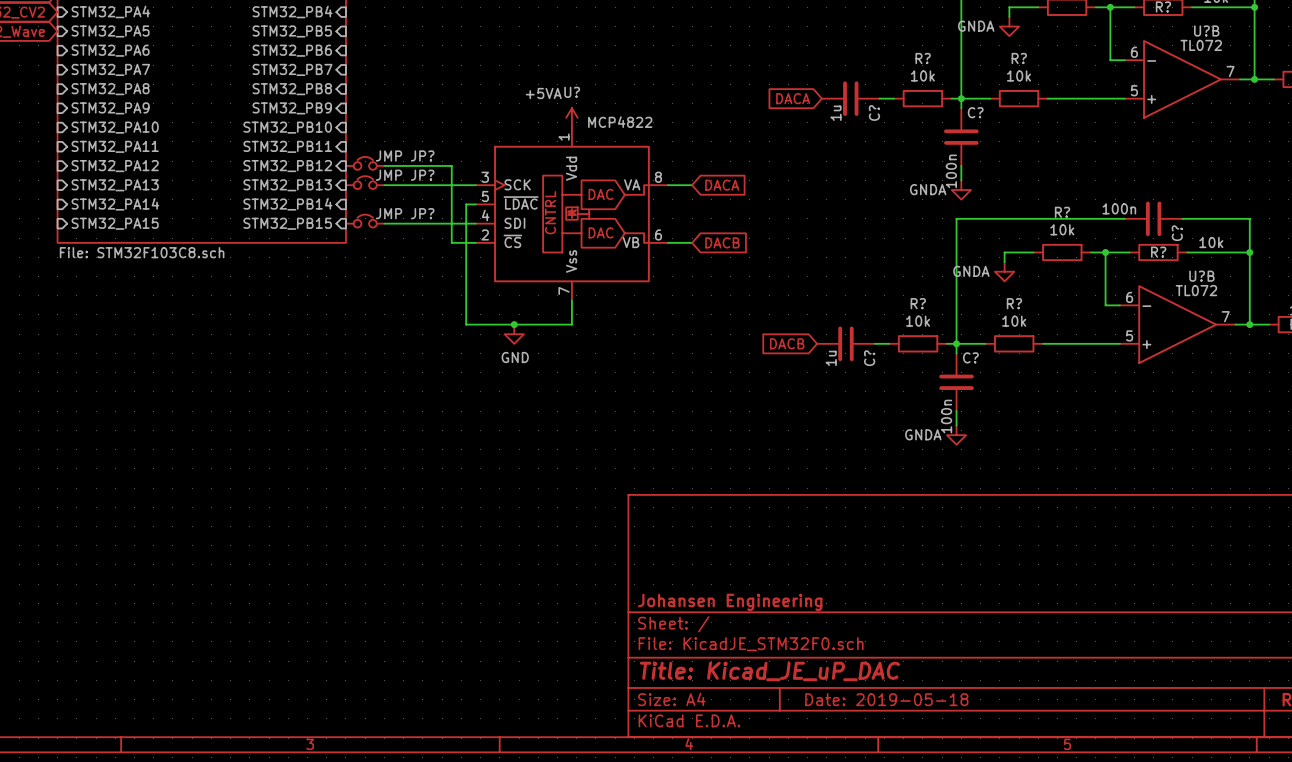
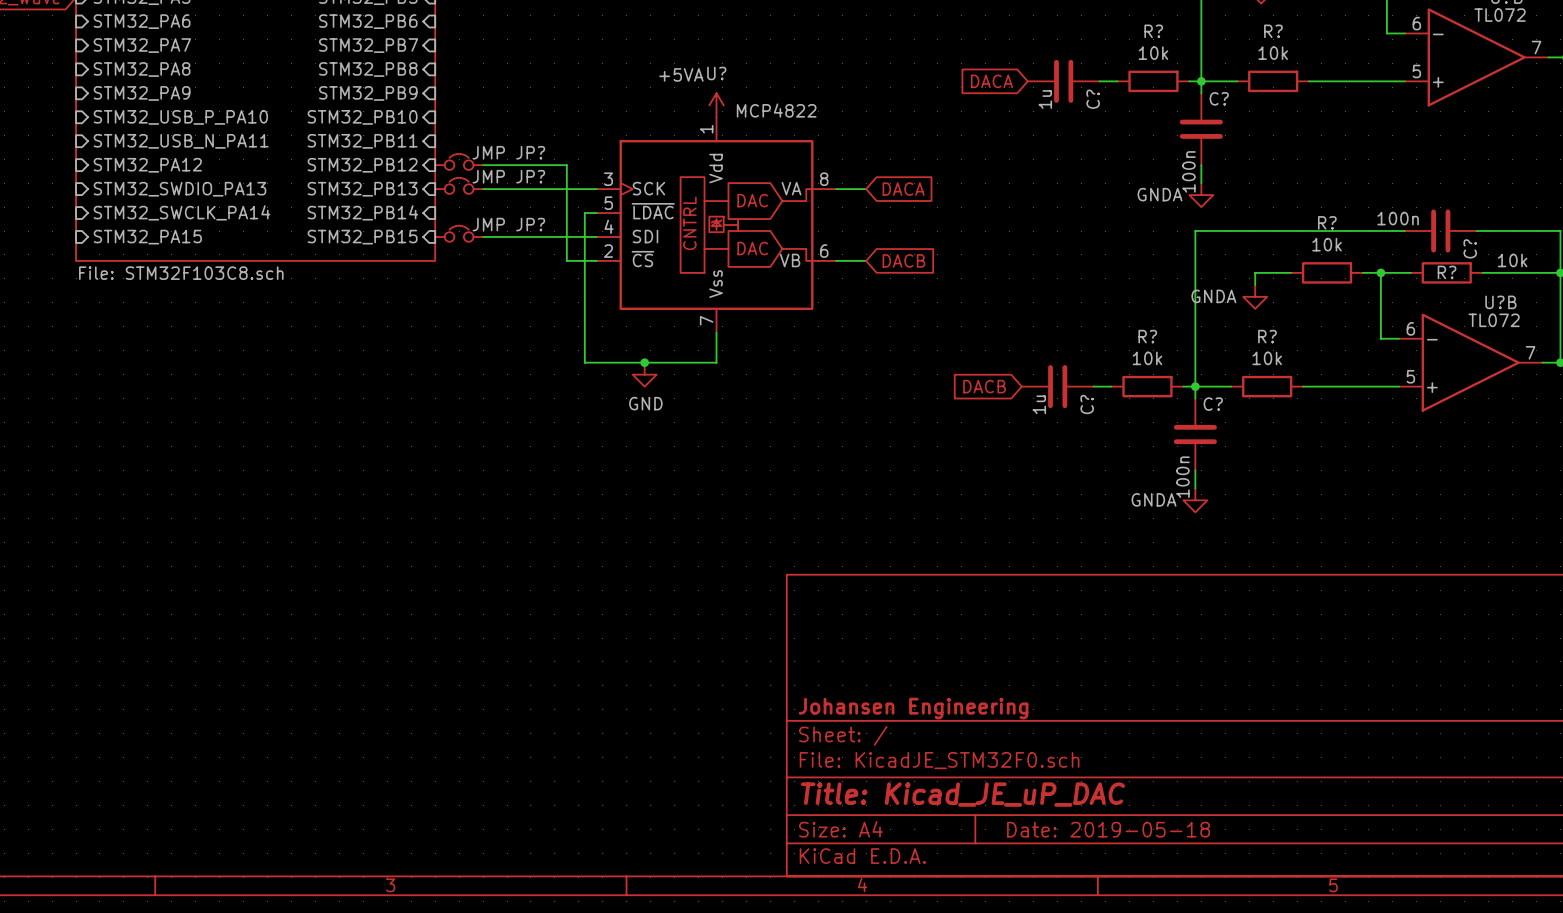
sheet pin: STM32_PA10 (115, 127) -> STM32_USB_P_PA10 (180, 117)
sheet pin: STM32_PA11 (115, 146) -> STM32_USB_N_PA11 (181, 141)
sheet pin: STM32_PA13 (115, 185) -> STM32_SWDIO_PA13 (179, 189)
sheet pin: STM32_PA14 (115, 204) -> STM32_SWCLK_PA14 (181, 212)

